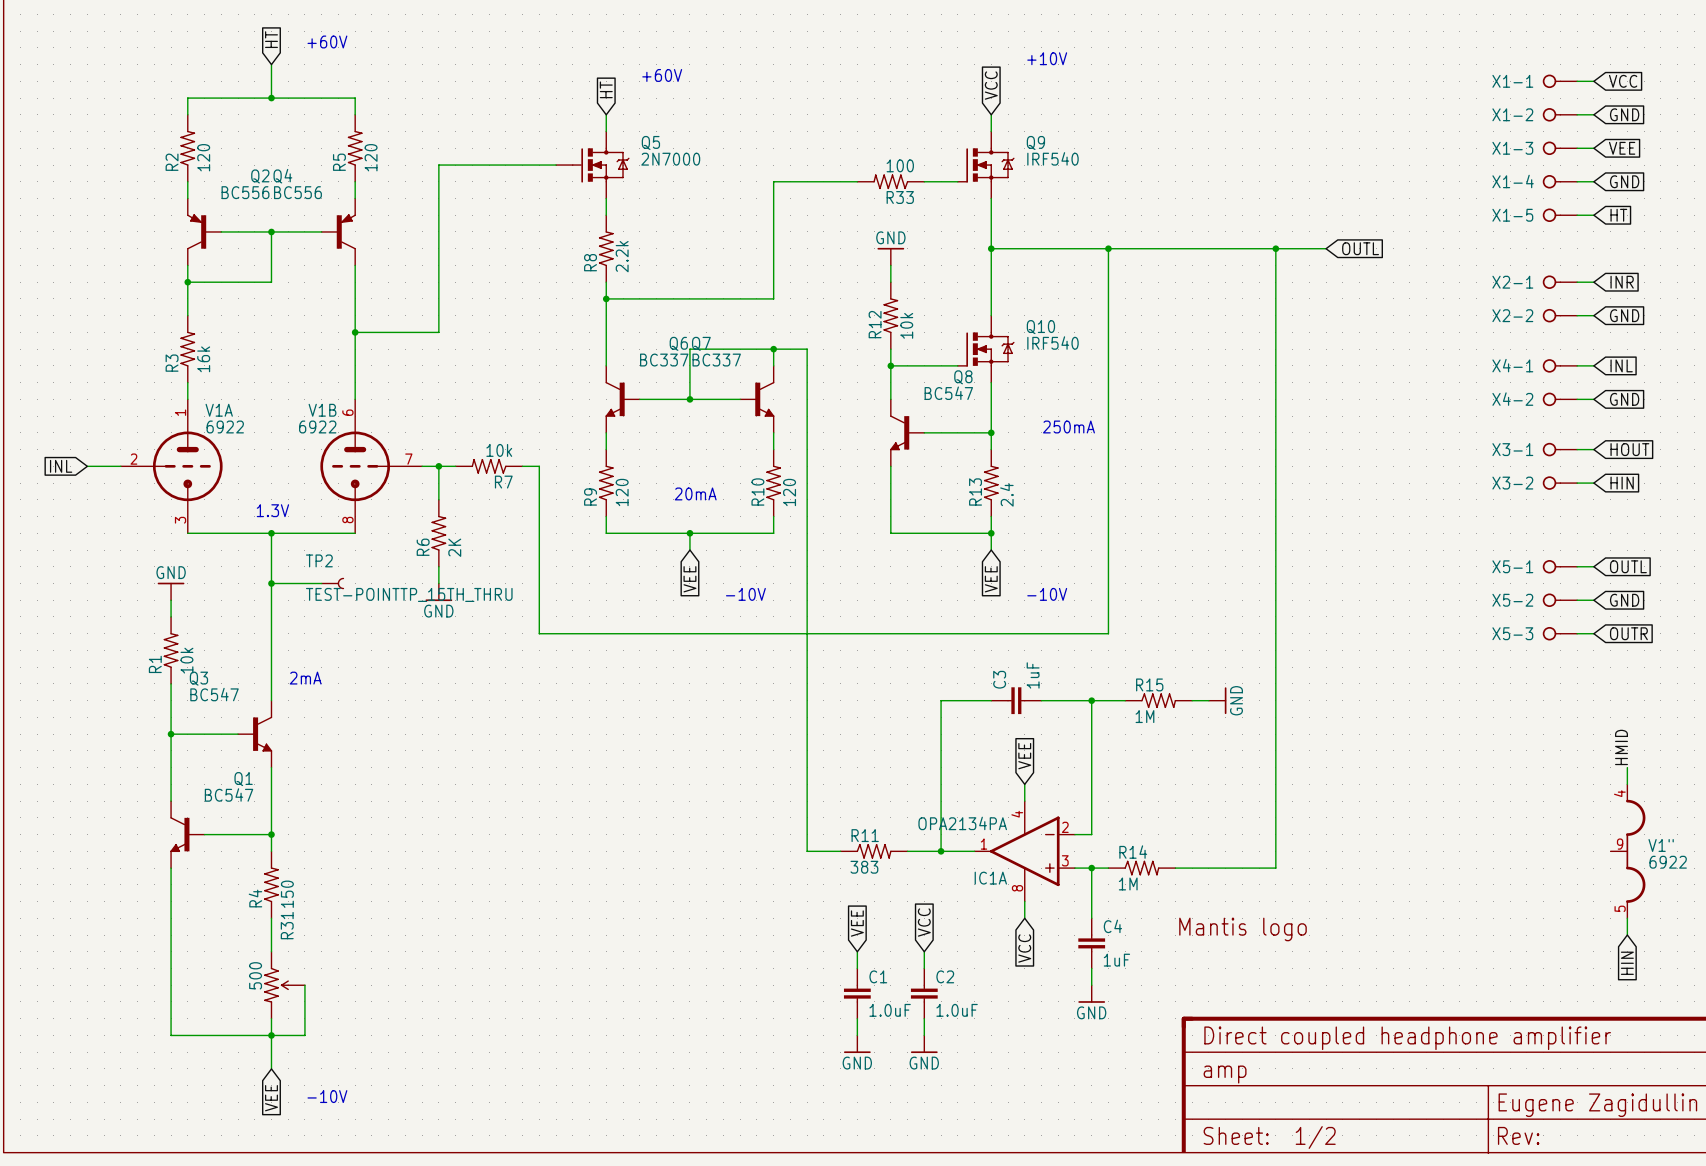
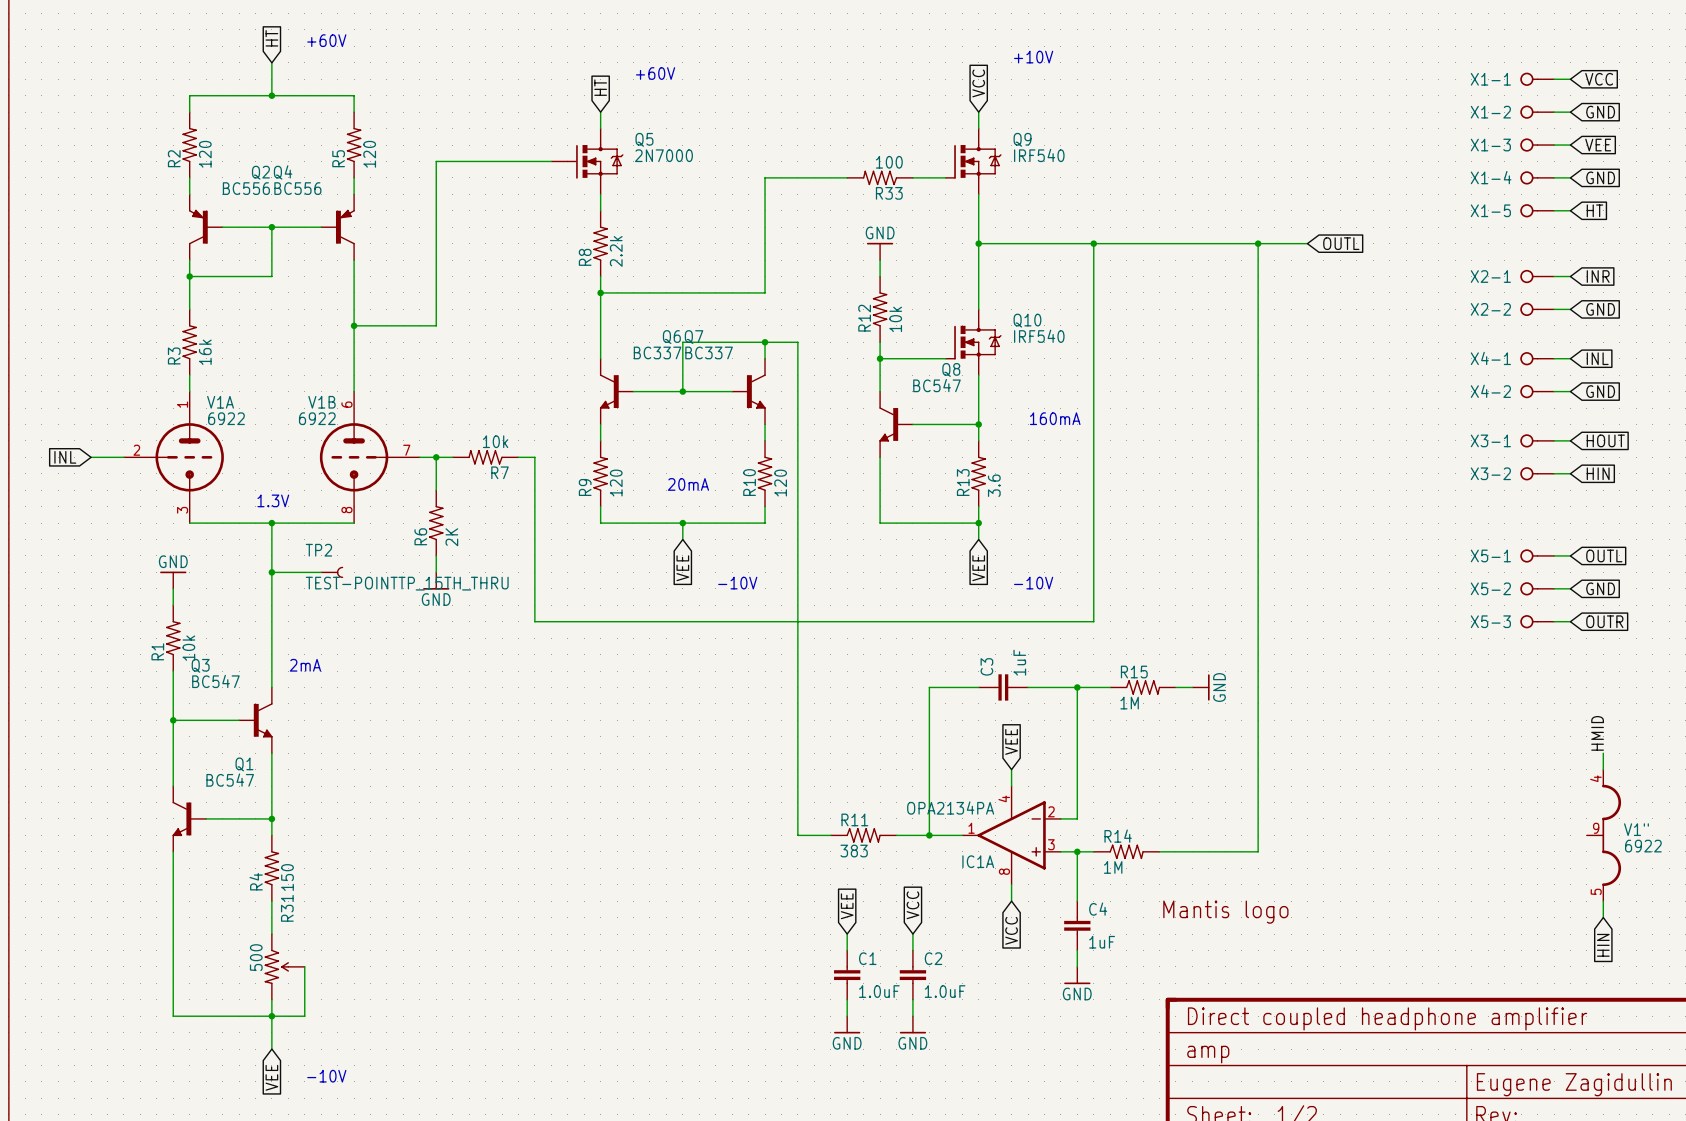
text: 250mA (1068, 426) -> 160mA (1055, 418)
R13 value: 2.4 (1006, 495) -> 3.6 (994, 485)

